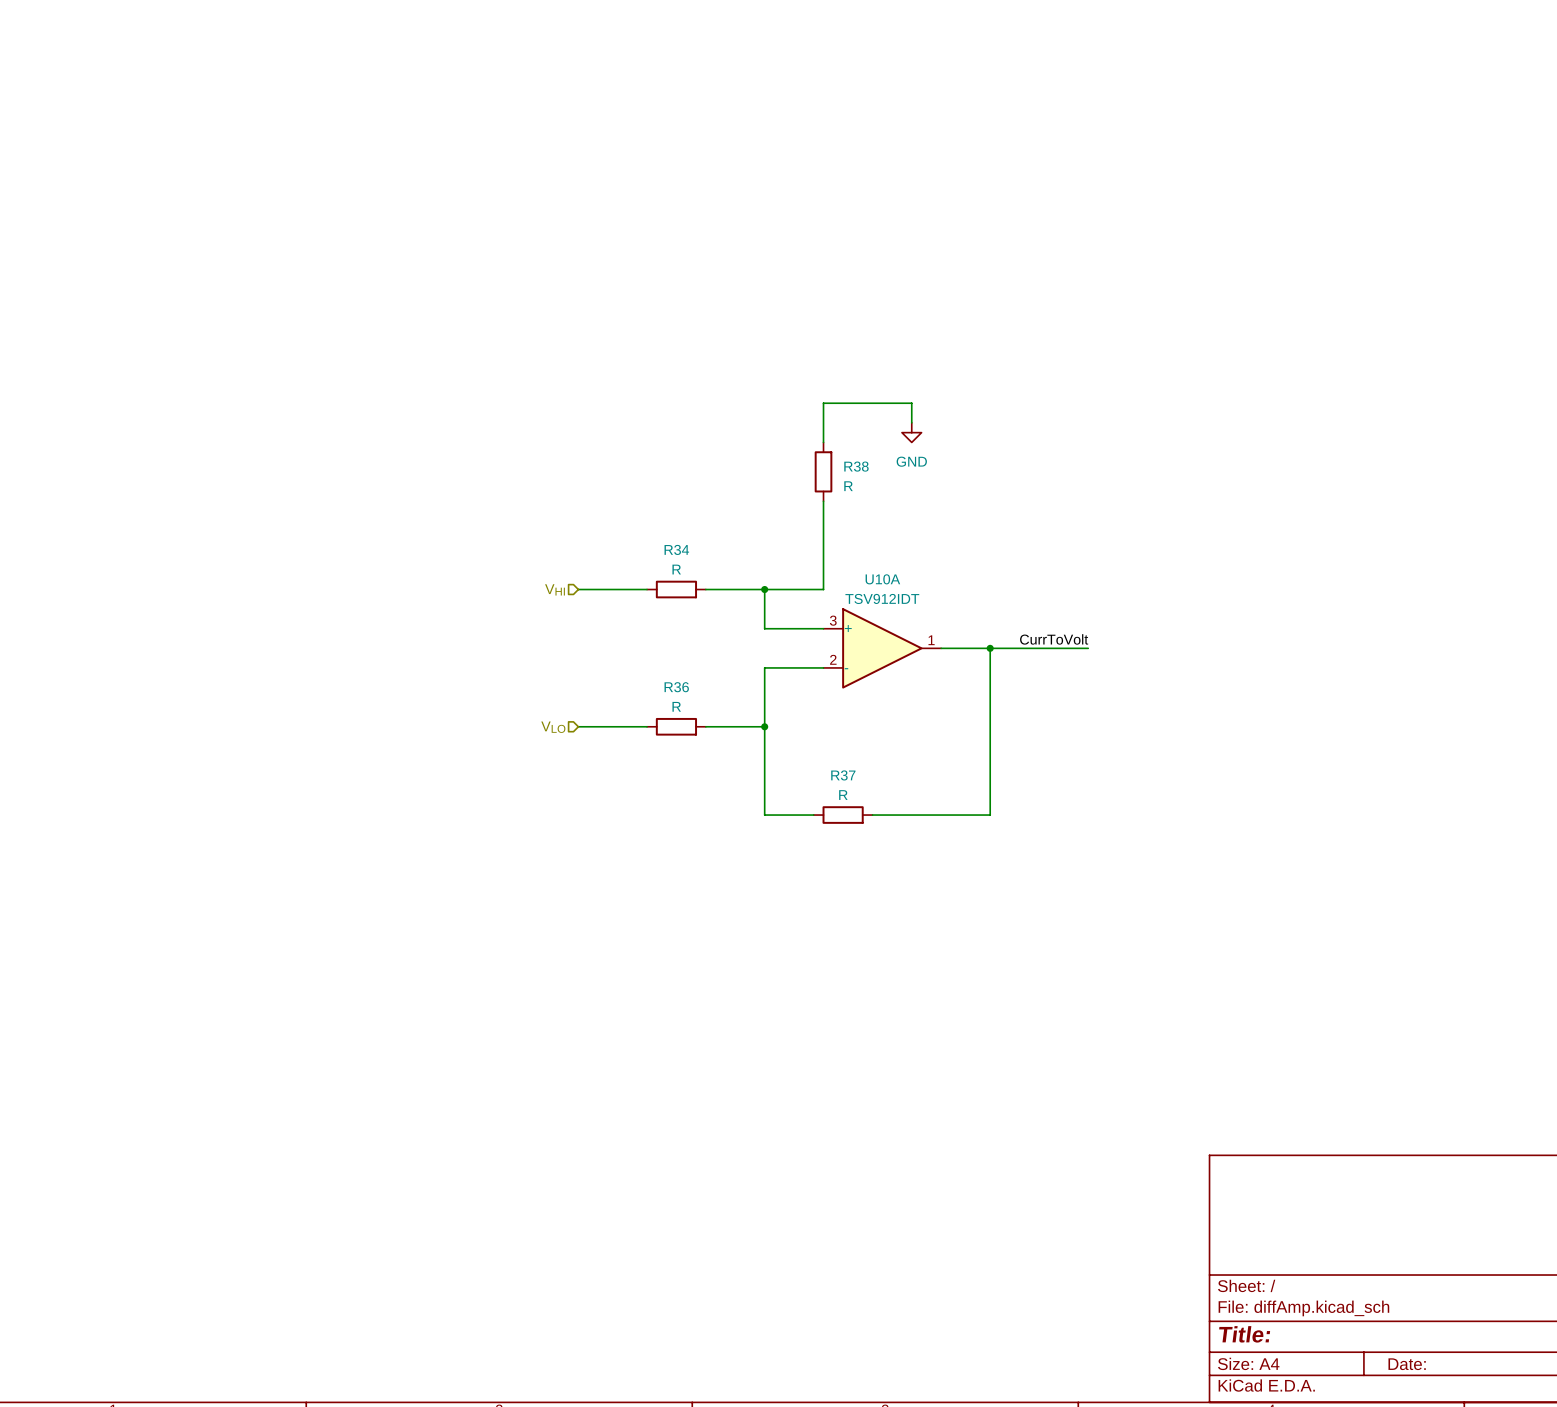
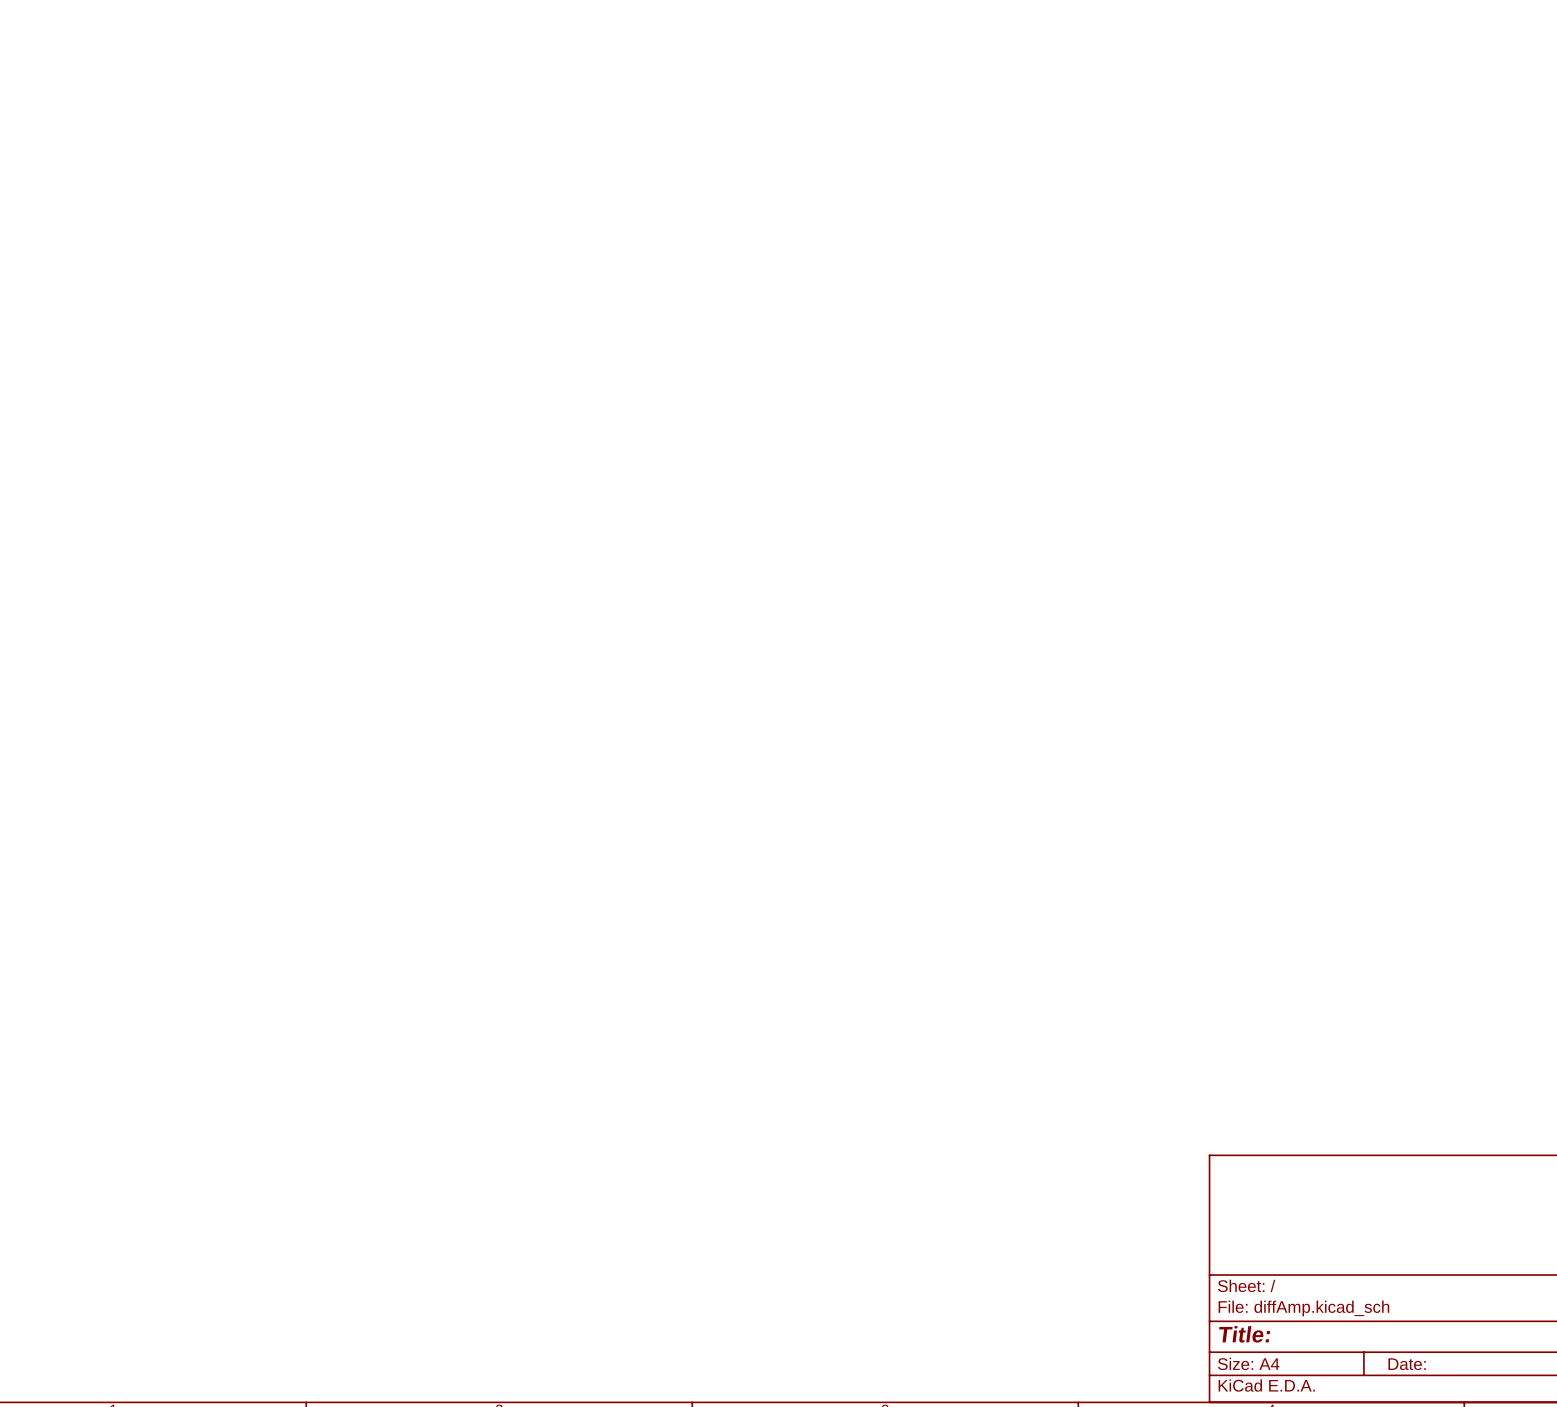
wire: (911, 422) (911, 403) (823, 403) (823, 442) -> none
power symbol: GND (911, 432) -> none
R38: R (823, 471) -> none
wire: (823, 501) (823, 589) (705, 589) -> none
hierarchical label: VHI (554, 589) -> none
wire: (578, 589) (647, 589) -> none
R34: R (676, 589) -> none
wire: (764, 589) (764, 628) (823, 628) -> none
junction: (764, 589) -> none
label: CurrToVolt (1054, 639) -> none
U10A: TSV912IDT (882, 648) -> none
wire: (941, 648) (1088, 648) -> none
wire: (990, 648) (990, 815) (872, 815) -> none
junction: (990, 648) -> none
wire: (823, 667) (764, 667) (764, 815) (813, 815) -> none
wire: (578, 726) (647, 726) -> none
R36: R (676, 726) -> none
wire: (705, 726) (764, 726) -> none
junction: (764, 726) -> none
hierarchical label: VLO (553, 727) -> none
R37: R (843, 815) -> none

